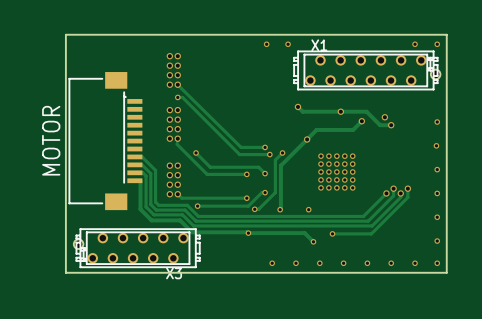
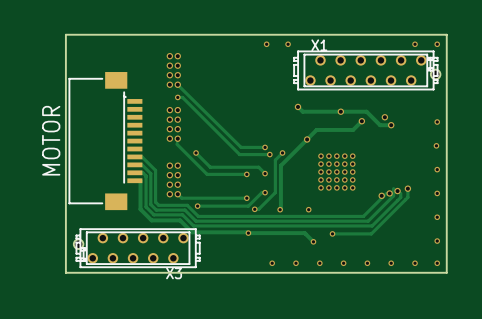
via: (393, 188) -> none
via: none -> (397, 191)
via: (386, 193) -> none
via: none -> (389, 193)
via: (400, 193) -> none
via: none -> (381, 195)

